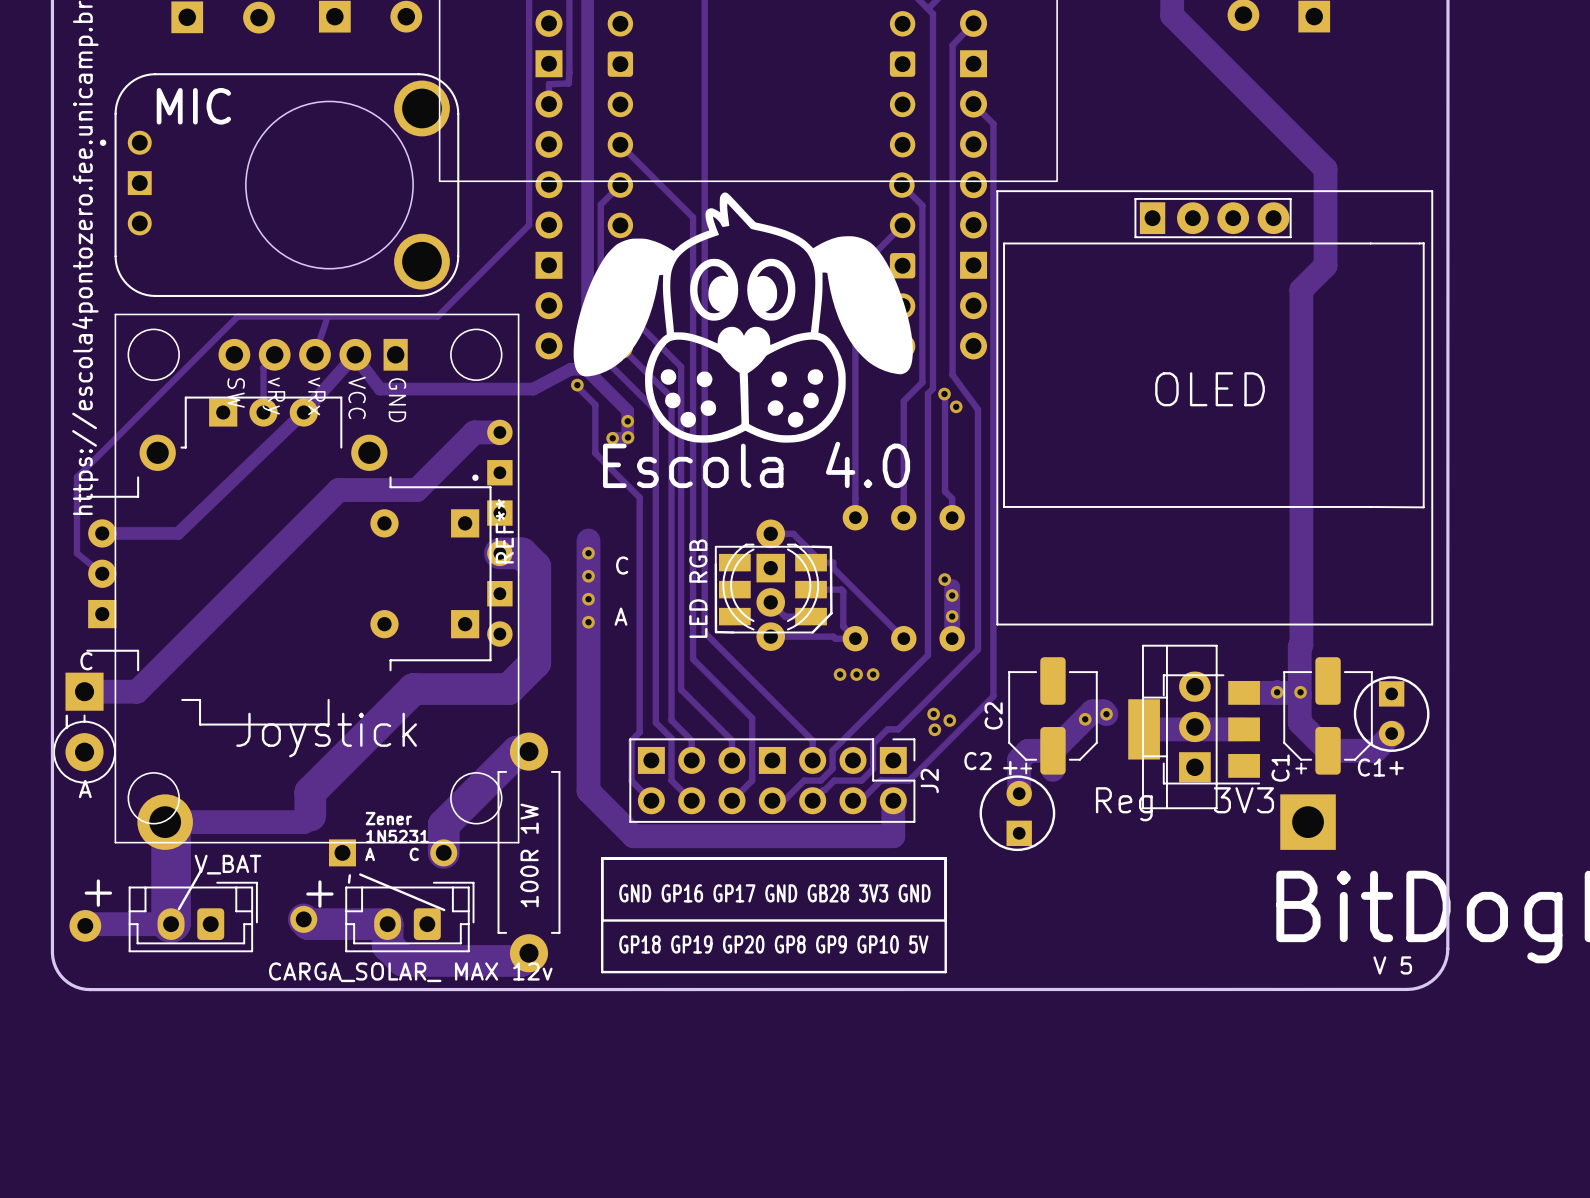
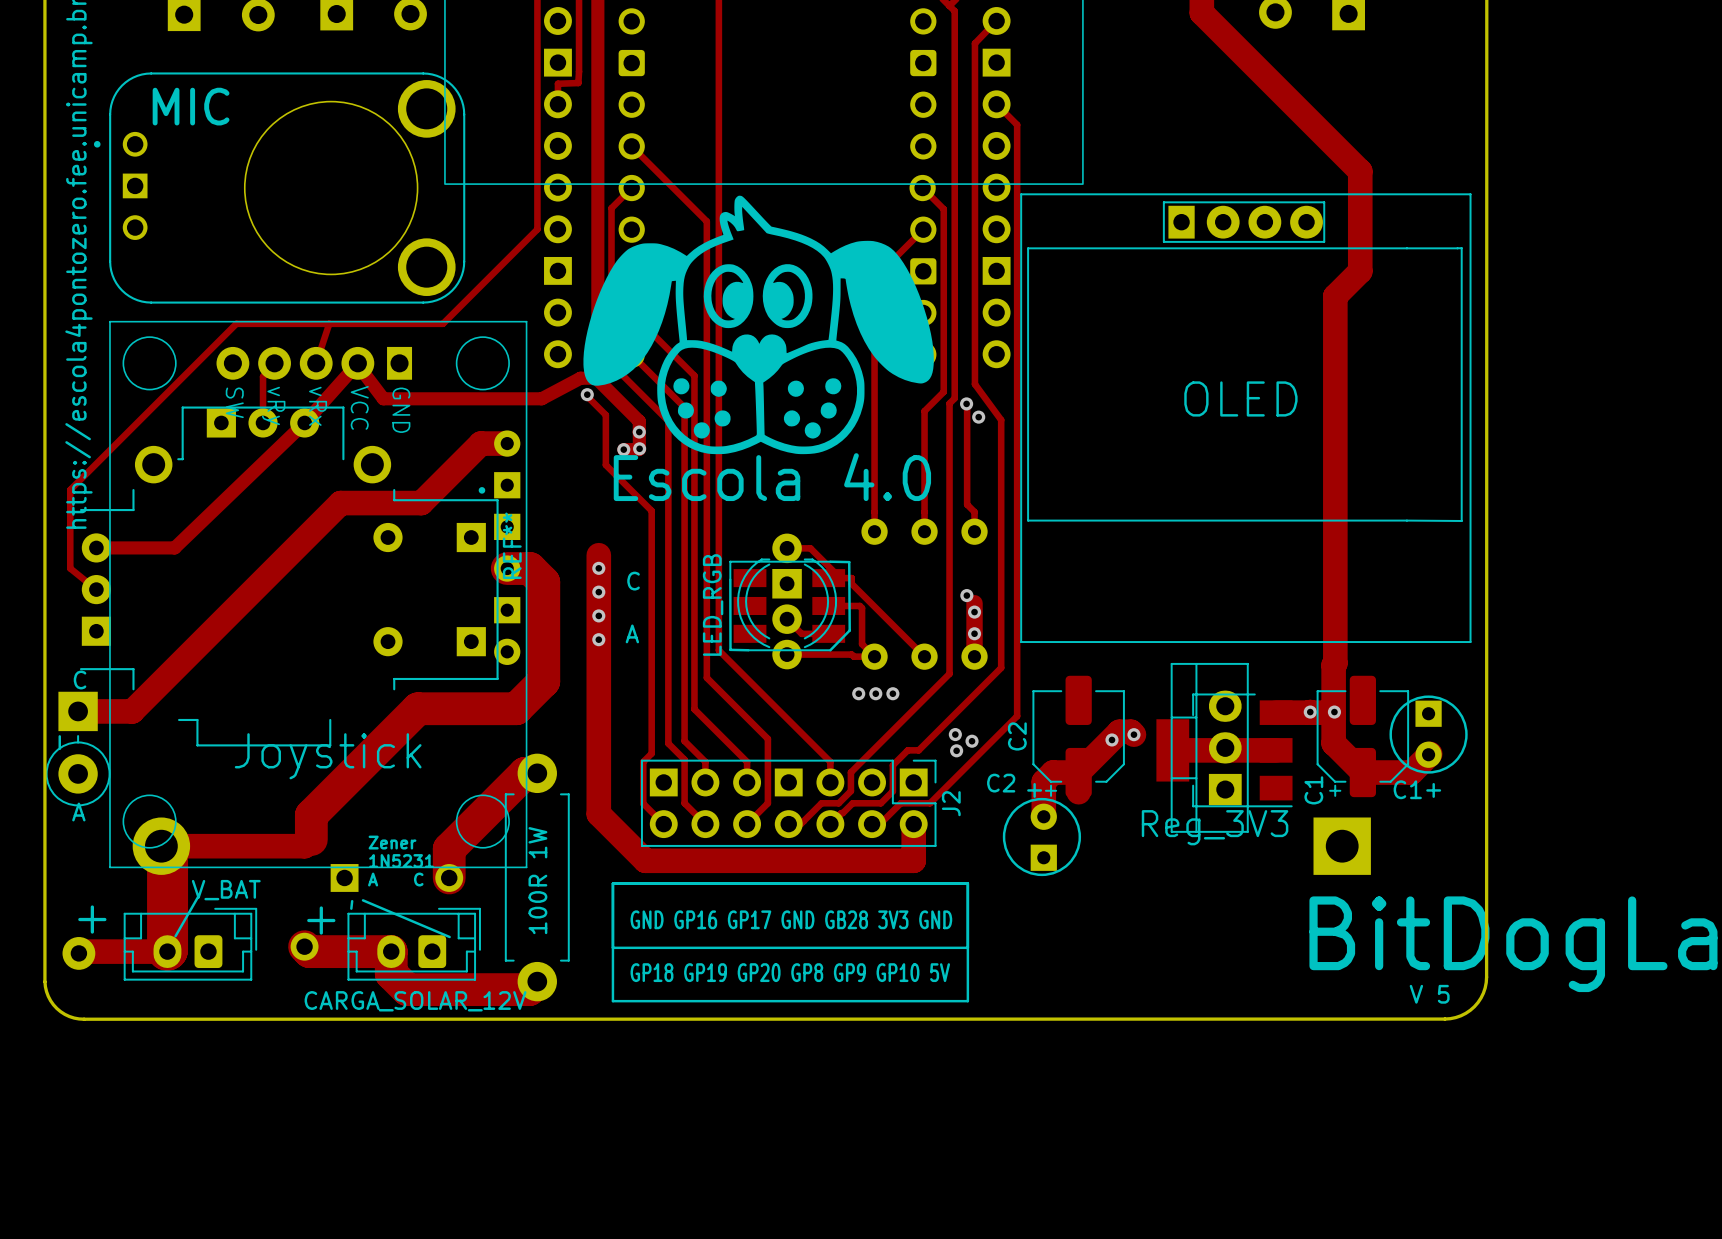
LED RGB name: LED RGB (698, 588) -> LED_RGB (713, 605)
Reg 3V3 name: Reg 3V3 (1184, 804) -> Reg_3V3 (1215, 827)
CARGA_SOLAR_ MAX 12v name: CARGA_SOLAR_ MAX 12v (410, 972) -> CARGA_SOLAR_12V (415, 1001)

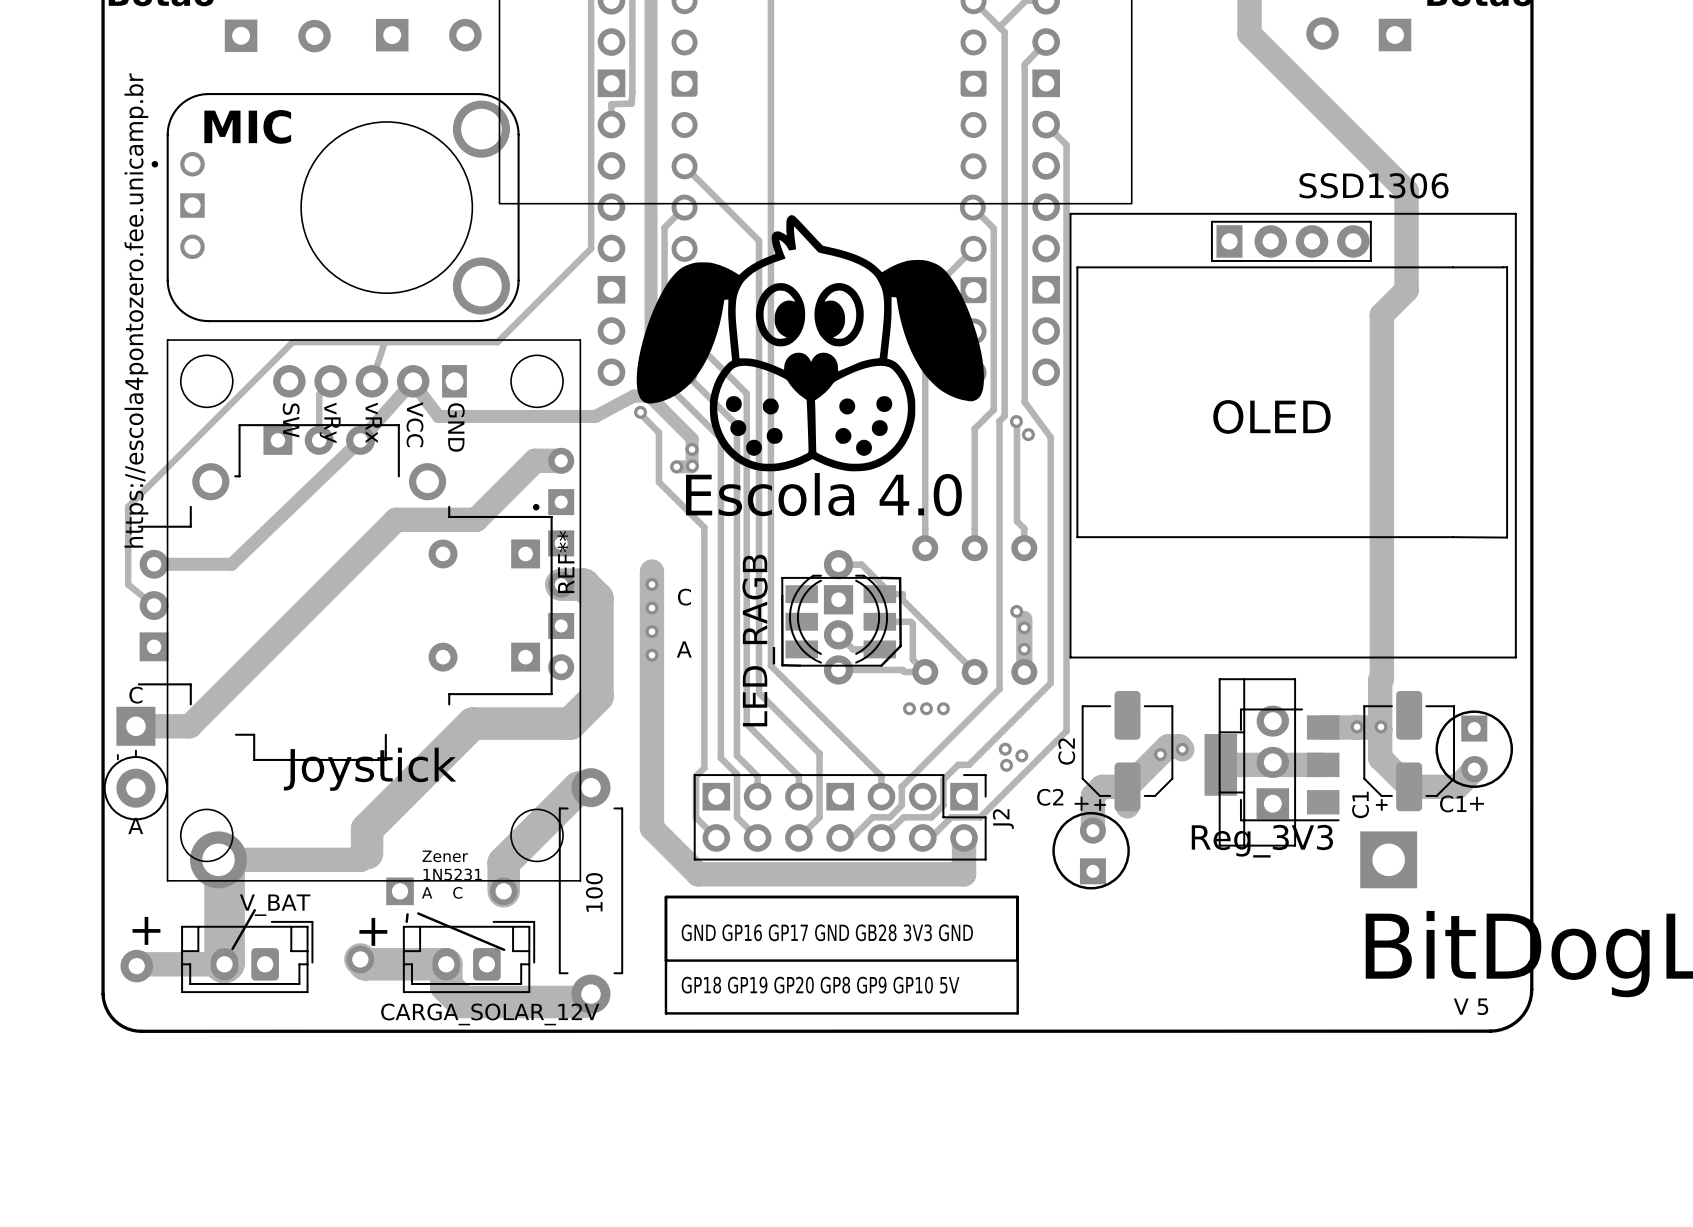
OLED value: none -> SSD1306 (1374, 185)
OLED name: OLED (1240, 398) -> none
OLED text: none -> OLED (1271, 416)
LED_RGB name: LED_RGB (713, 605) -> none
part value: none -> LED_RAGB (758, 640)
part value: none -> 100 (594, 892)
text: 100R 1W (537, 880) -> none
V_BAT value: none -> V_BAT (275, 905)
V_BAT name: V_BAT (226, 890) -> none
CARGA_SOLAR_12V value: none -> CARGA_SOLAR_12V (490, 1014)
CARGA_SOLAR_12V name: CARGA_SOLAR_12V (415, 1001) -> none

